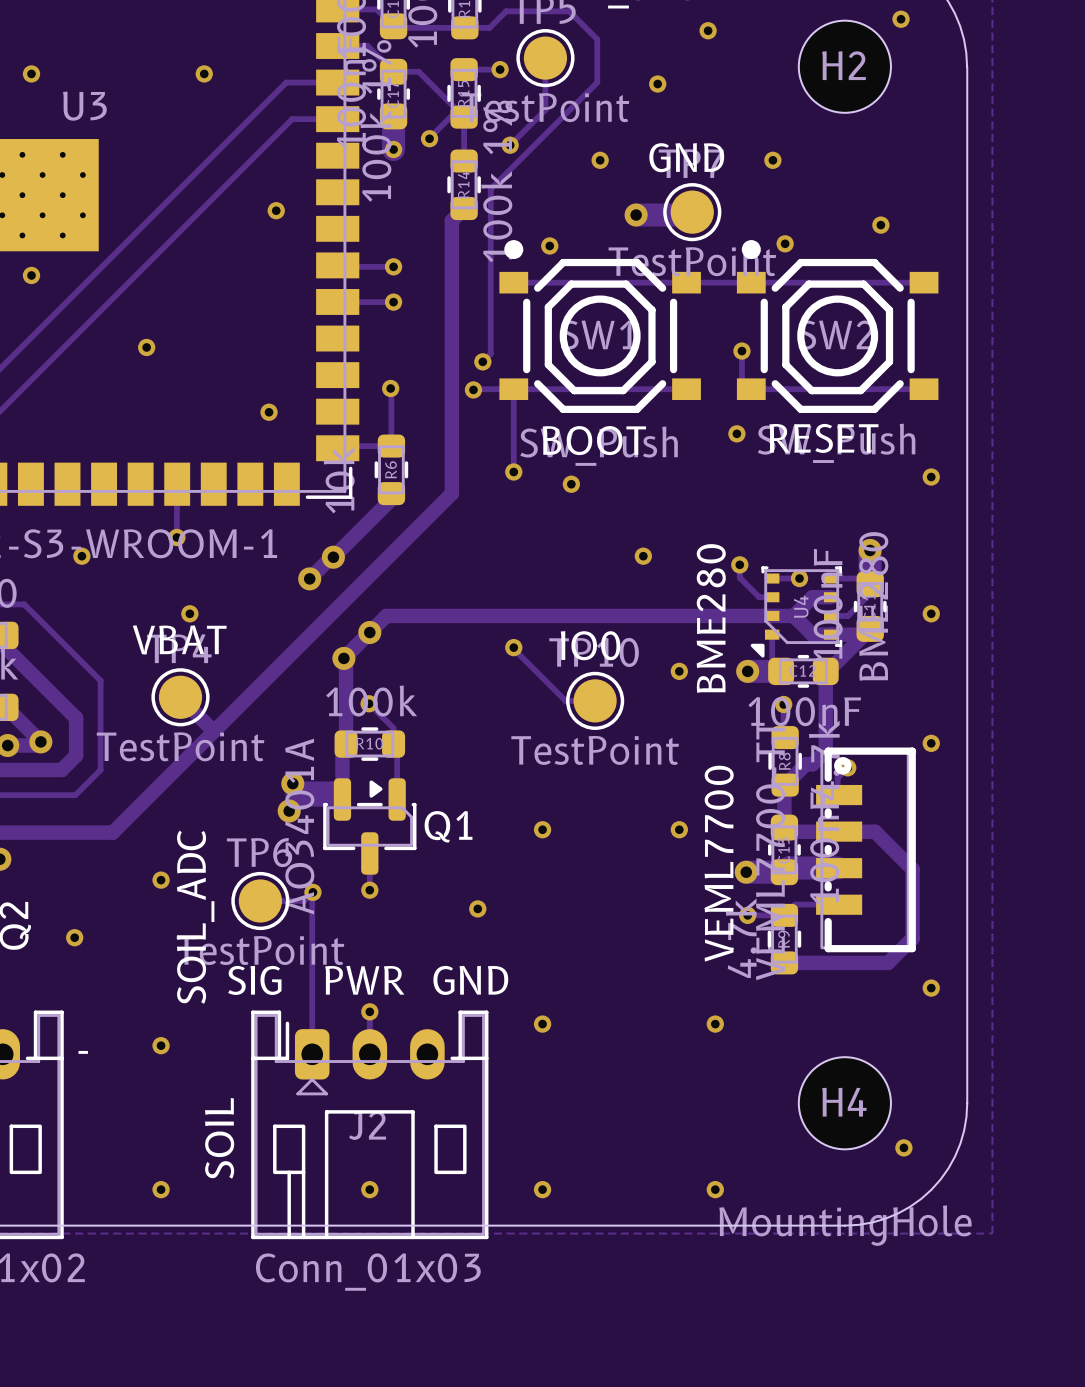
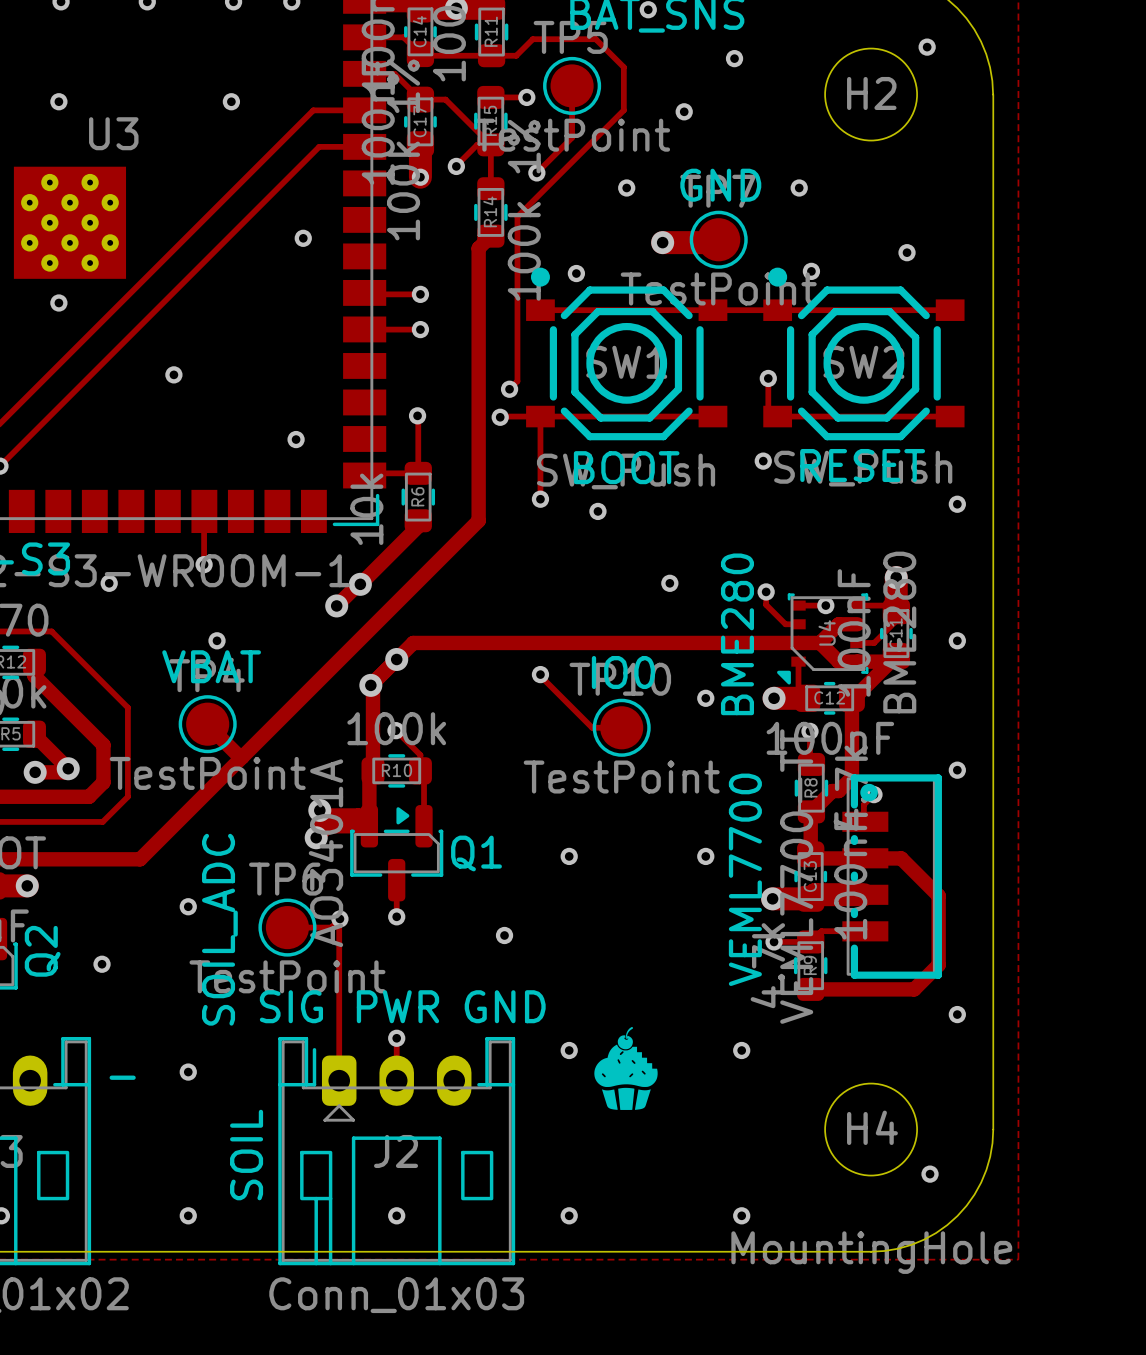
drawing: none -> [594, 1026, 658, 1110]

